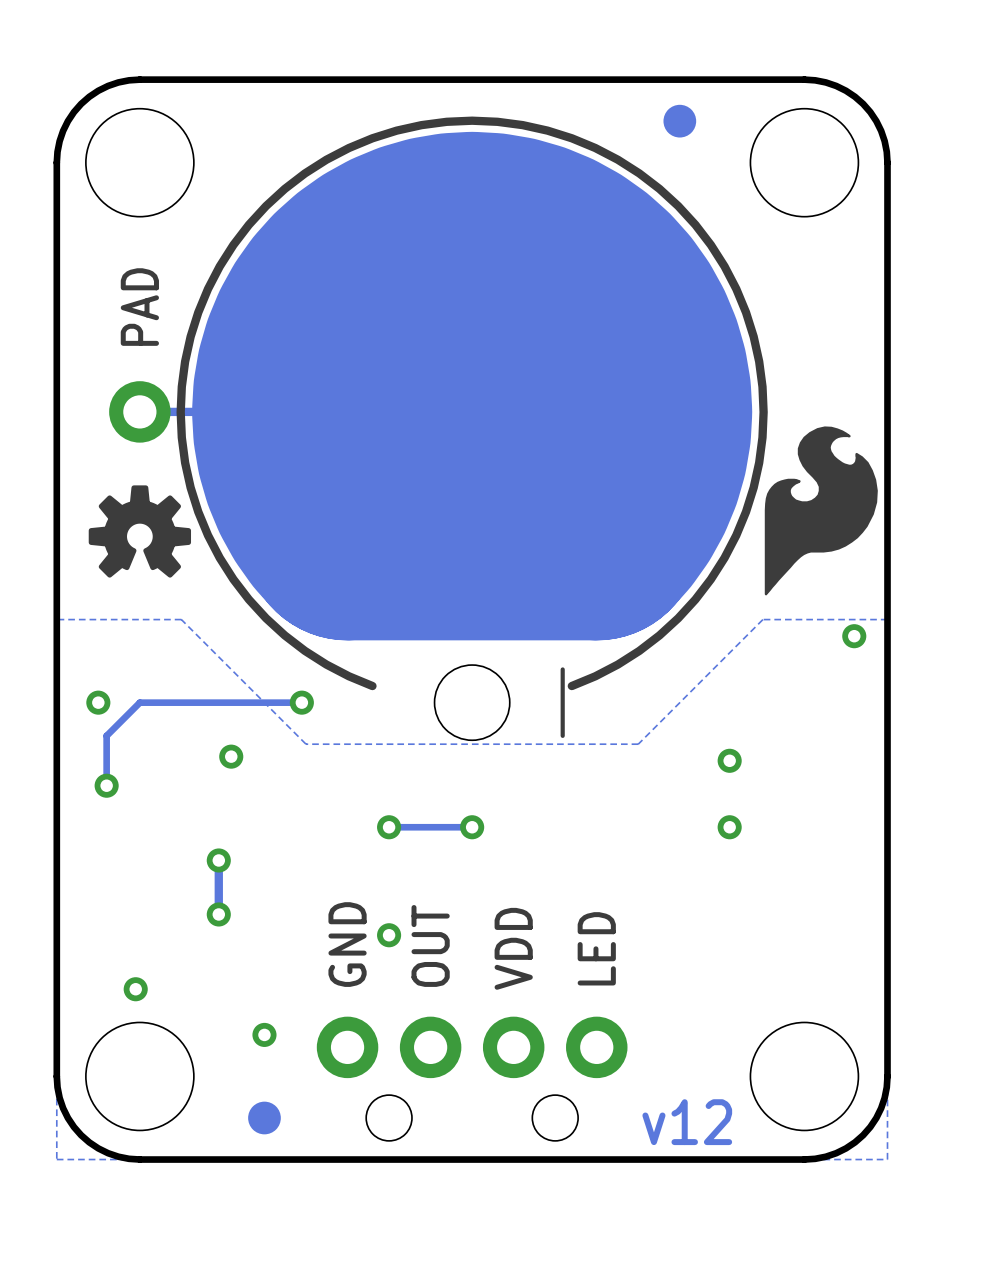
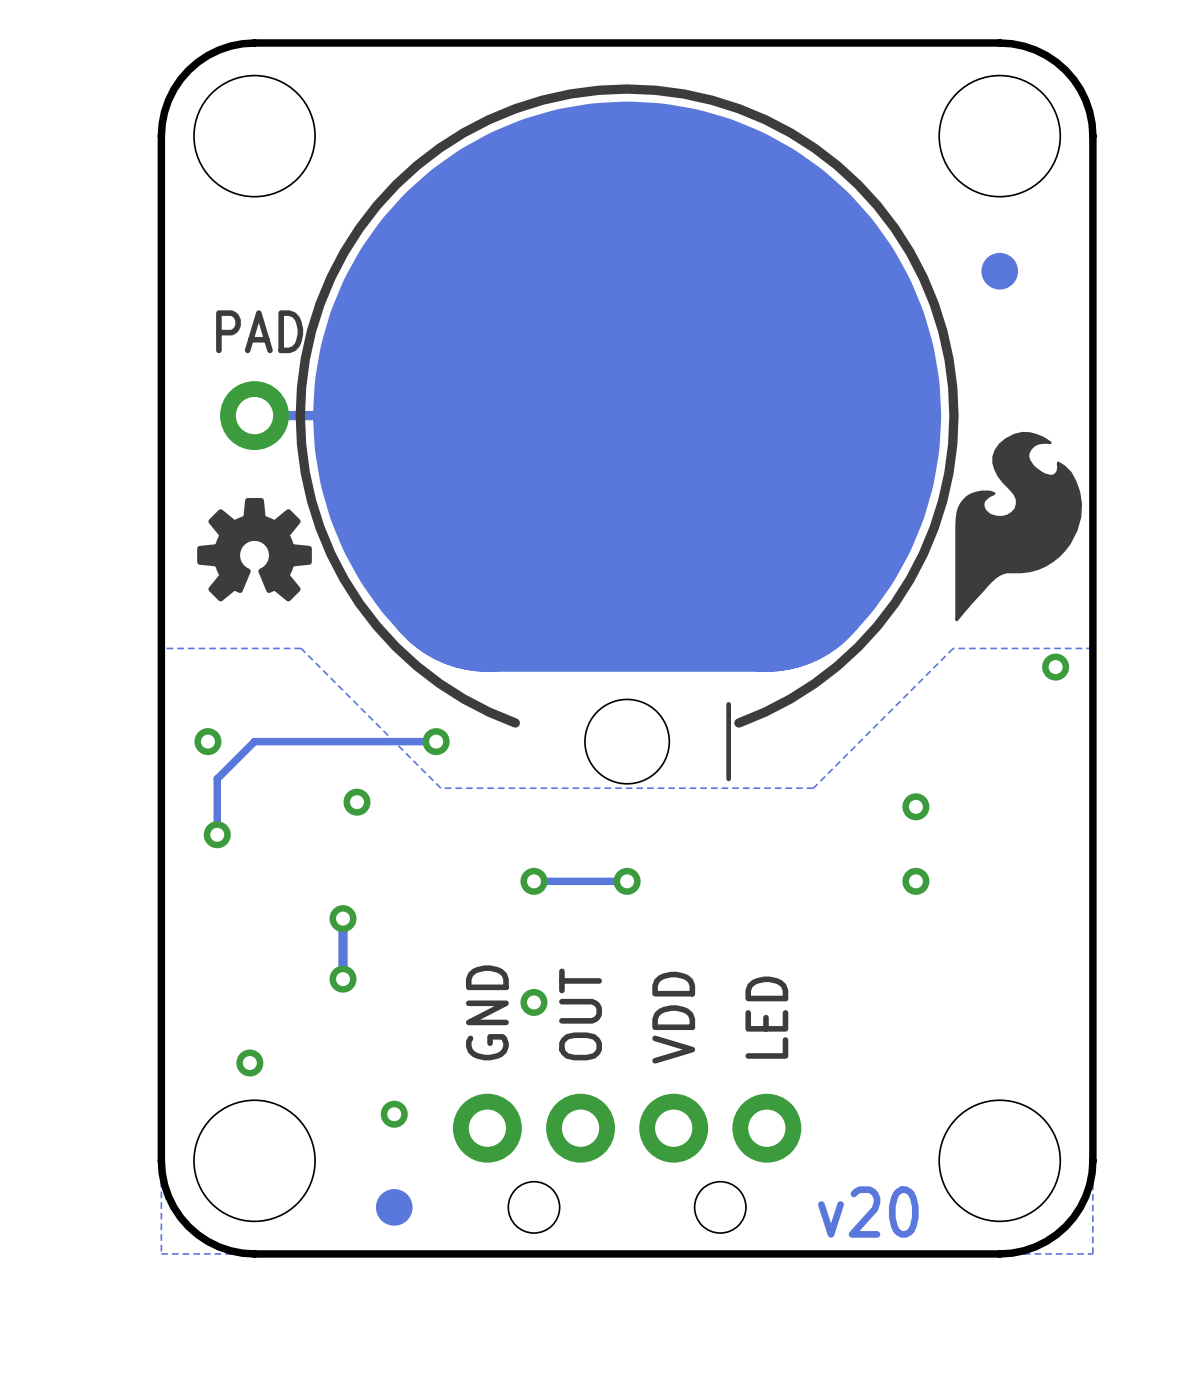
part position: (679, 121) -> (999, 271)
text rotation: 0° (139, 307) -> 90° clockwise (259, 331)
text: v12 (687, 1122) -> v20 (868, 1212)

